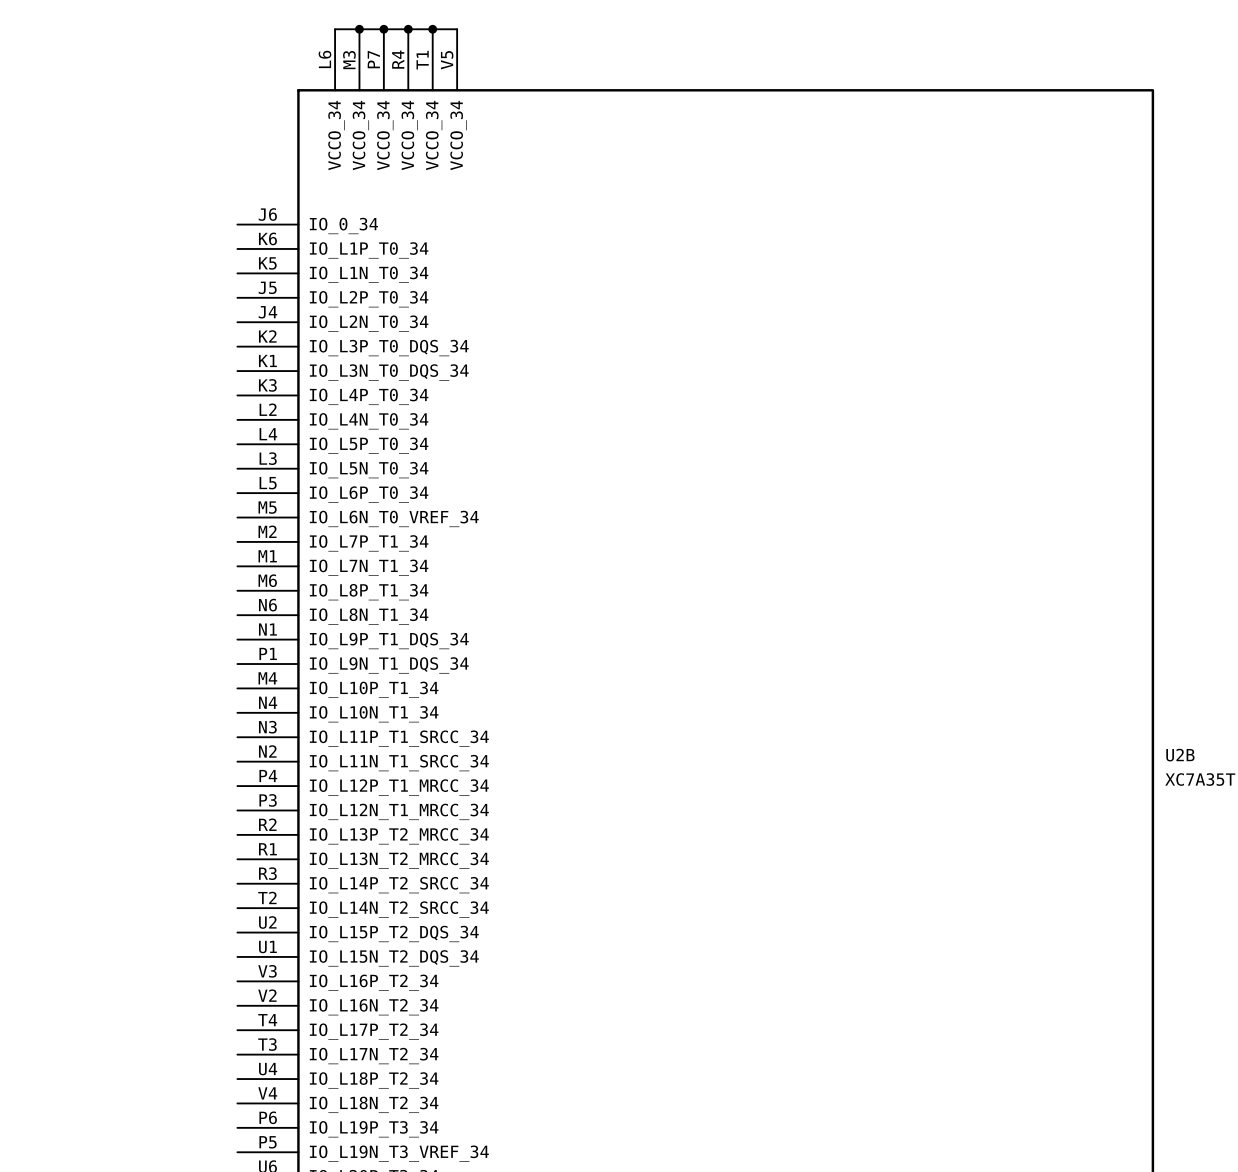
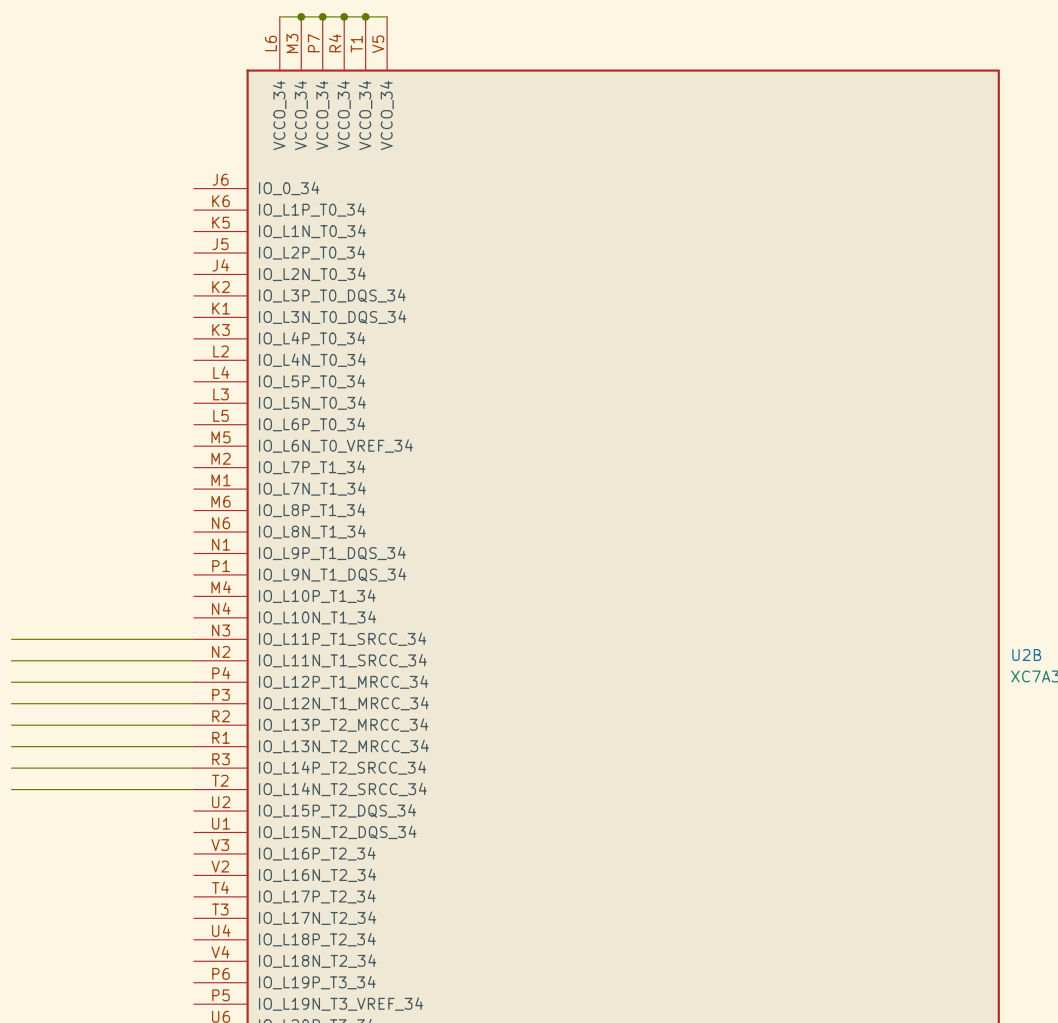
wire: none -> (11, 639) (193, 639)
wire: none -> (11, 660) (193, 660)
wire: none -> (11, 682) (193, 682)
wire: none -> (11, 703) (193, 703)
wire: none -> (11, 725) (193, 725)
wire: none -> (11, 746) (193, 746)
wire: none -> (11, 768) (193, 768)
wire: none -> (11, 789) (193, 789)

